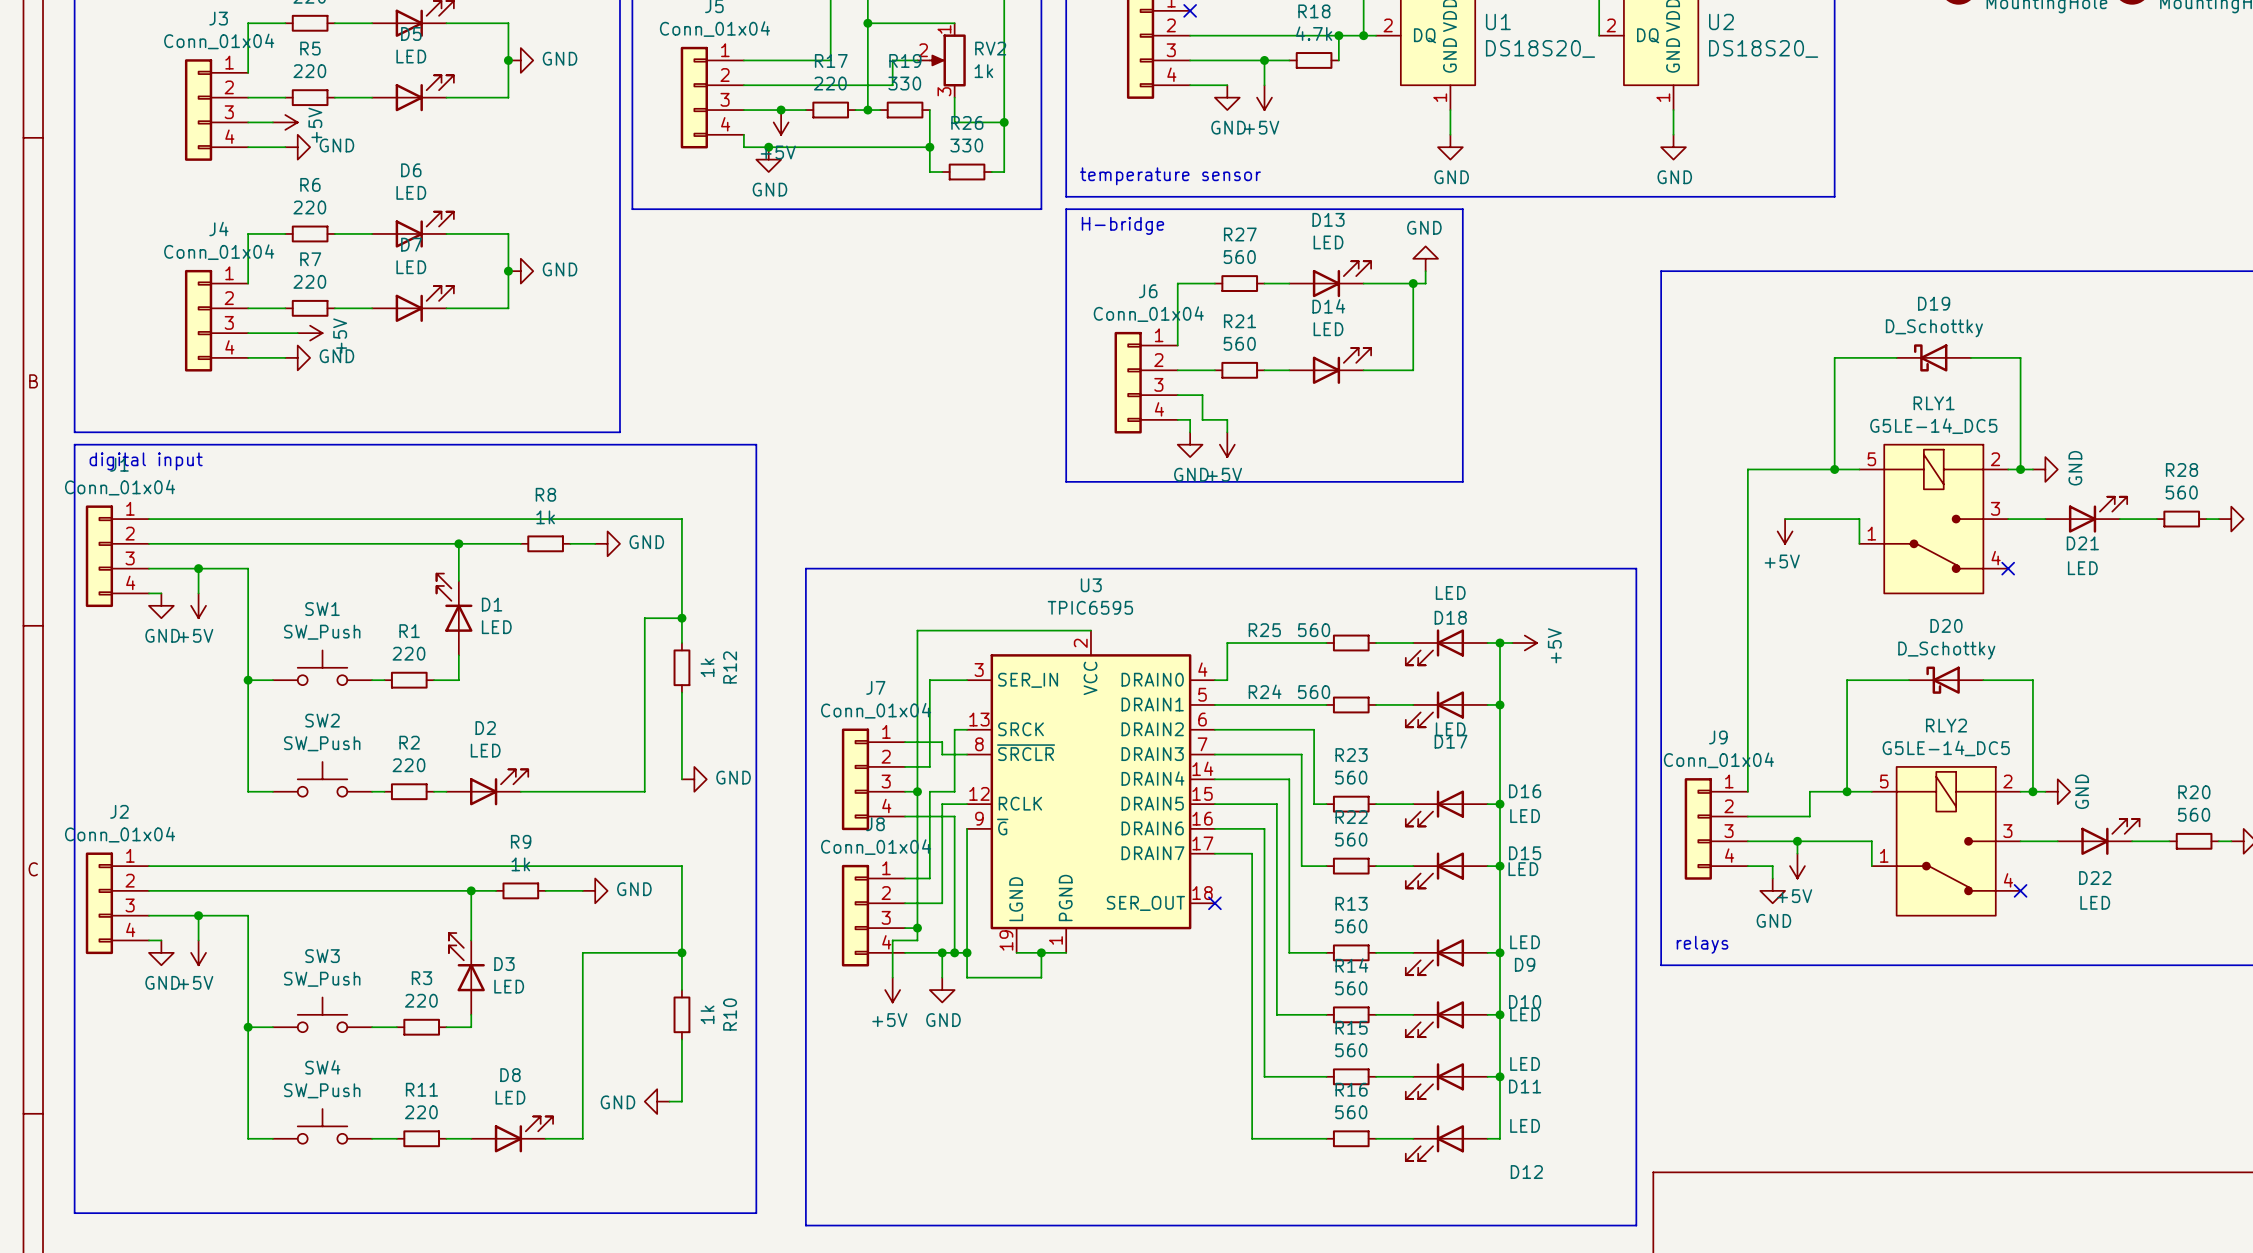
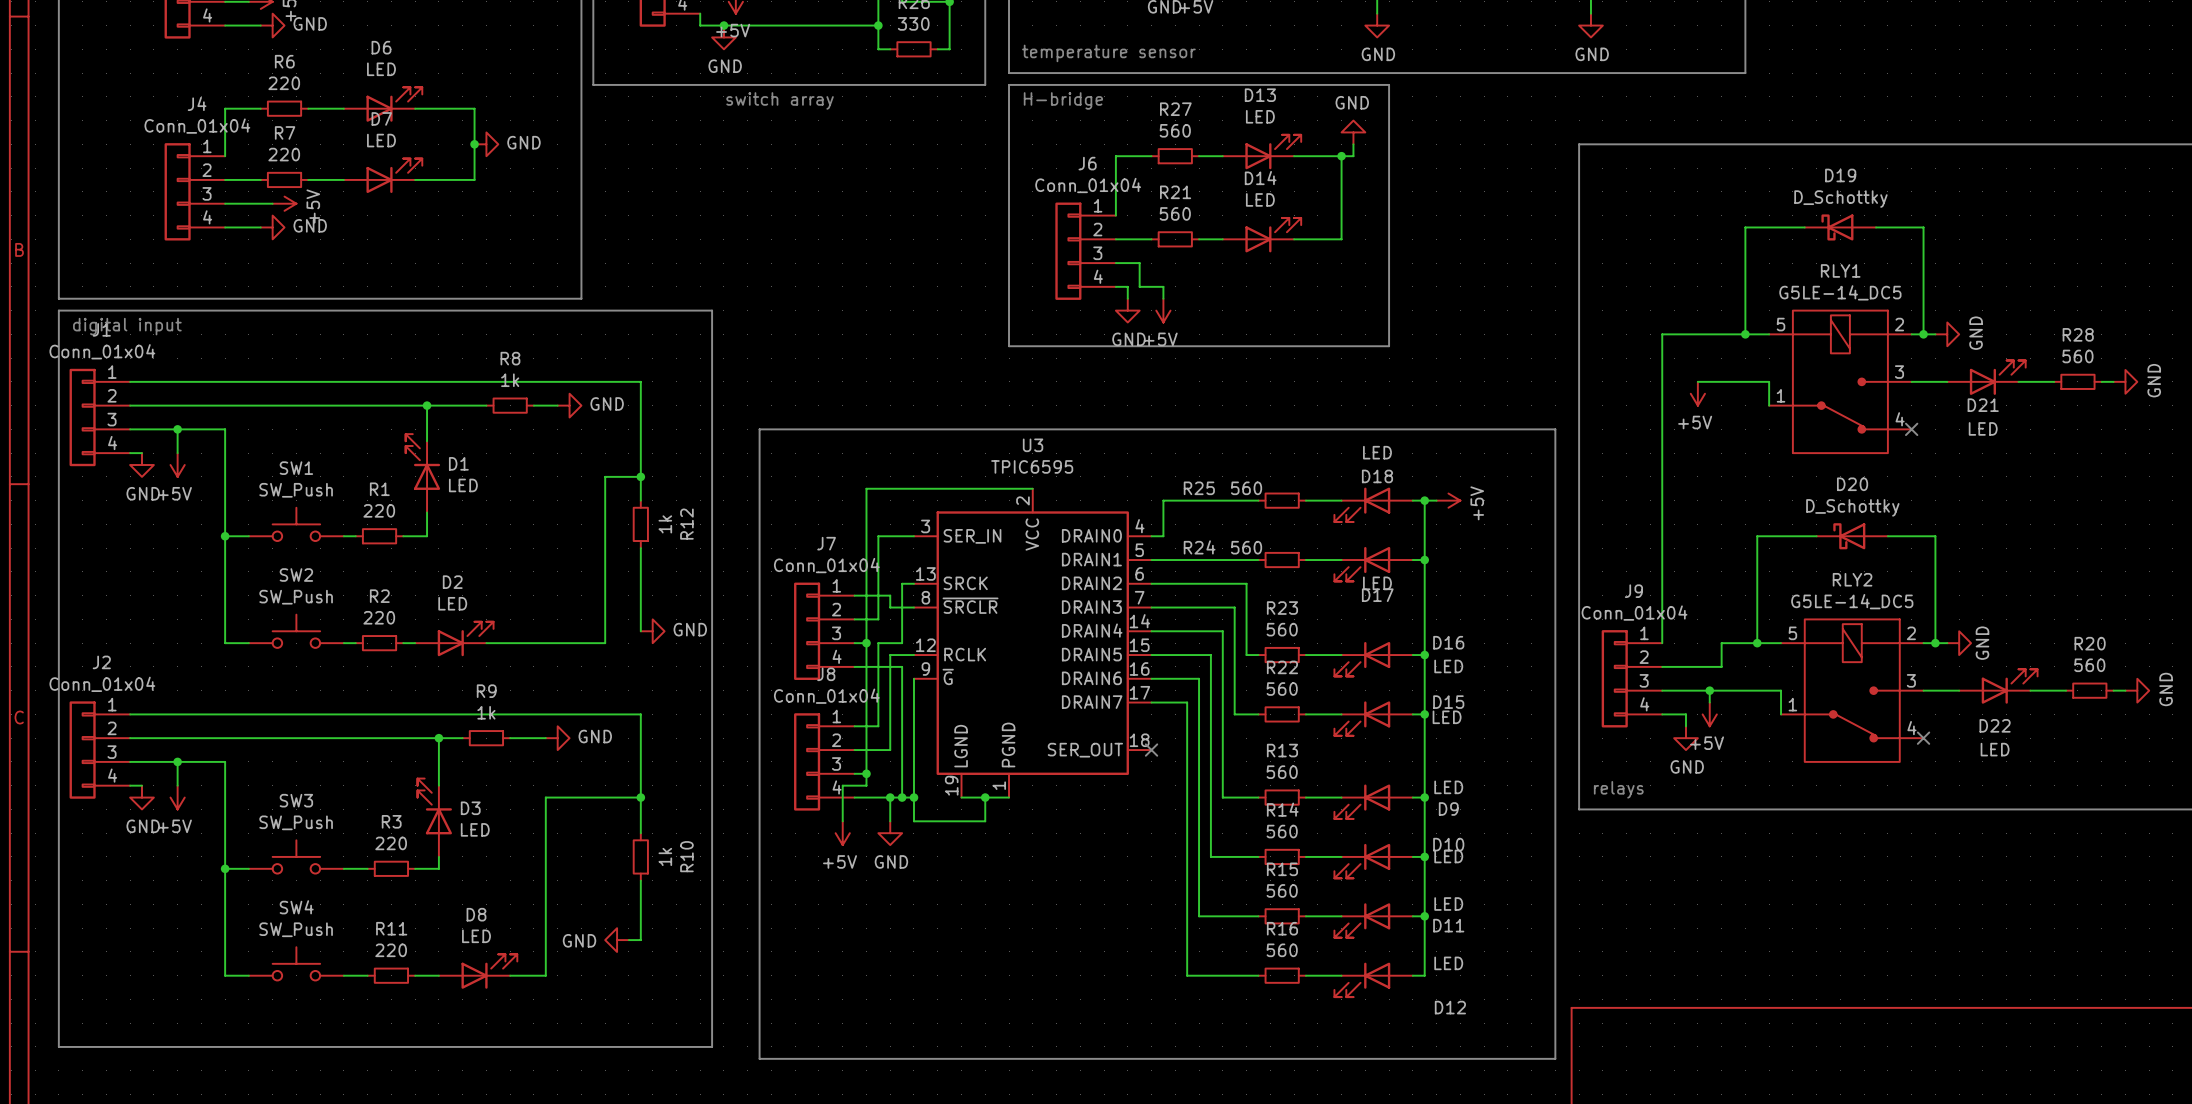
text: none -> switch array (780, 100)

